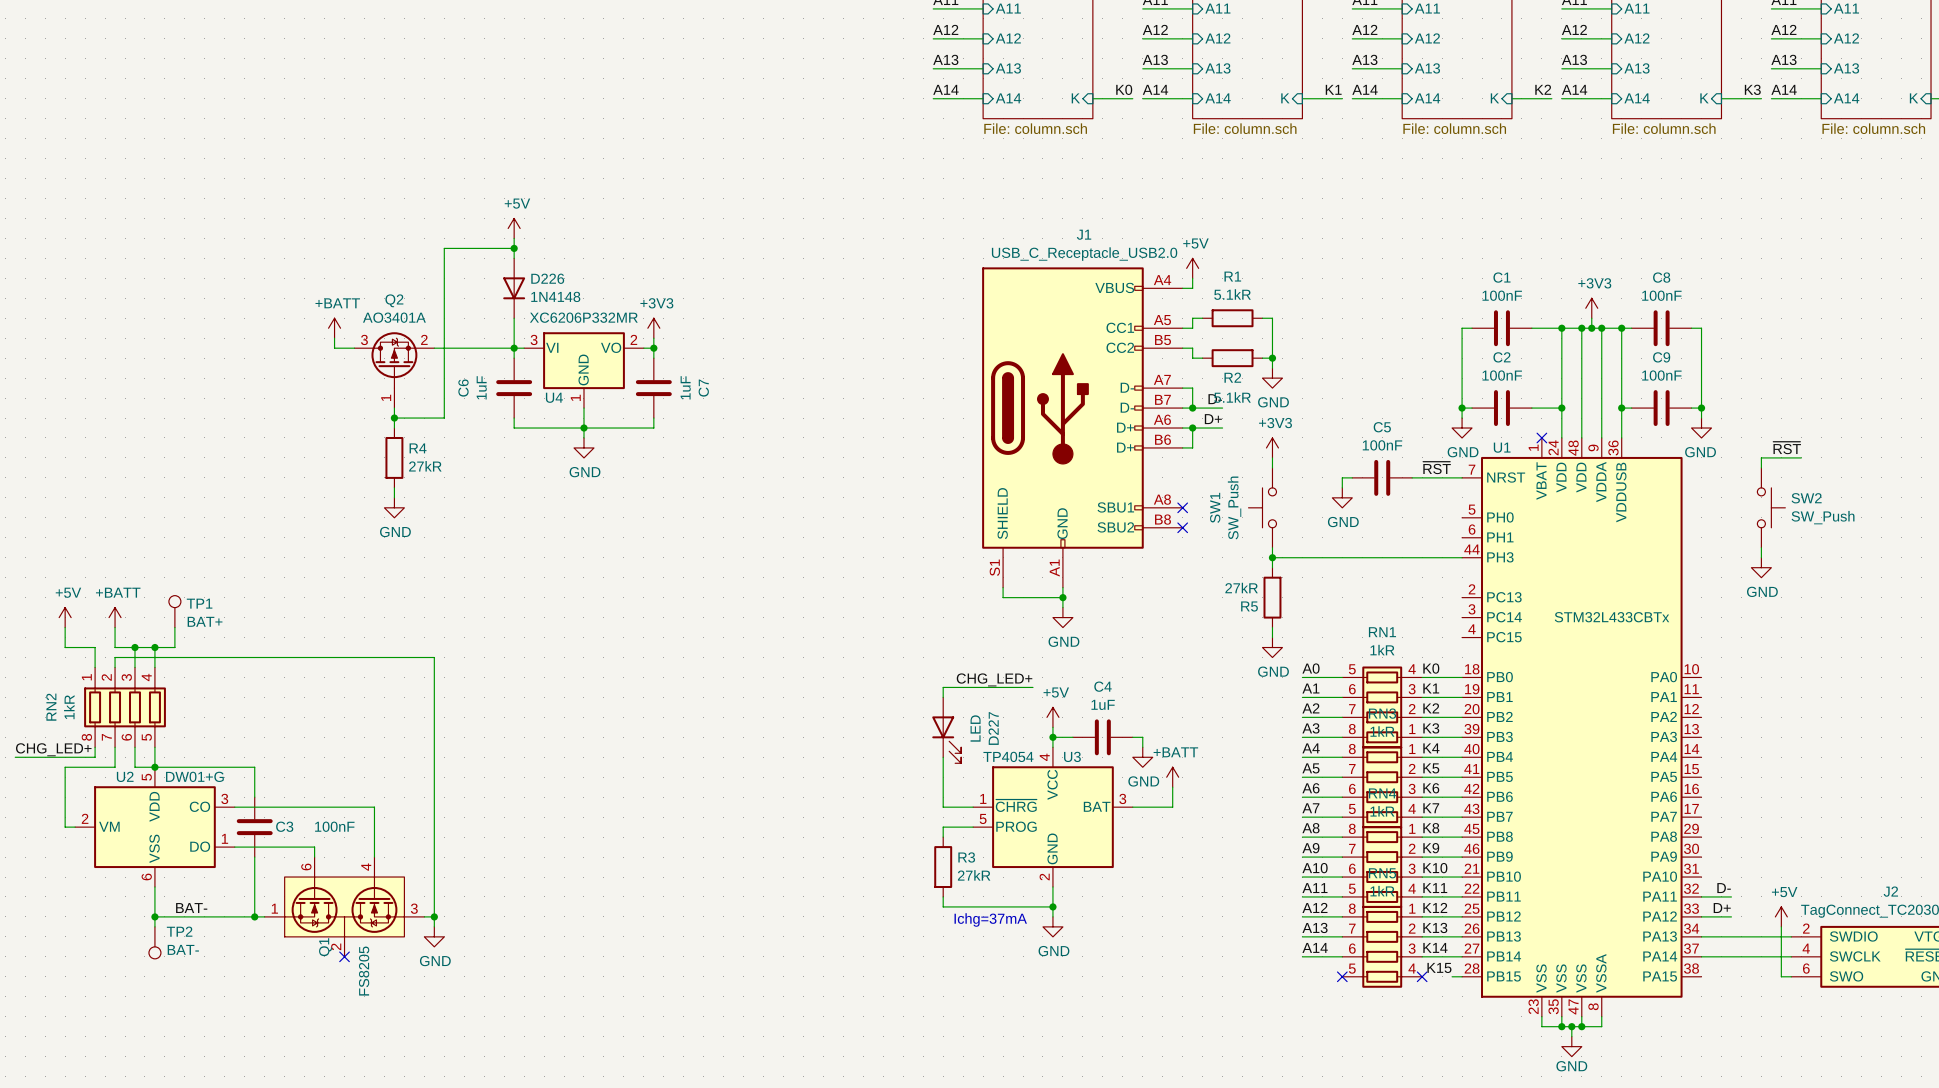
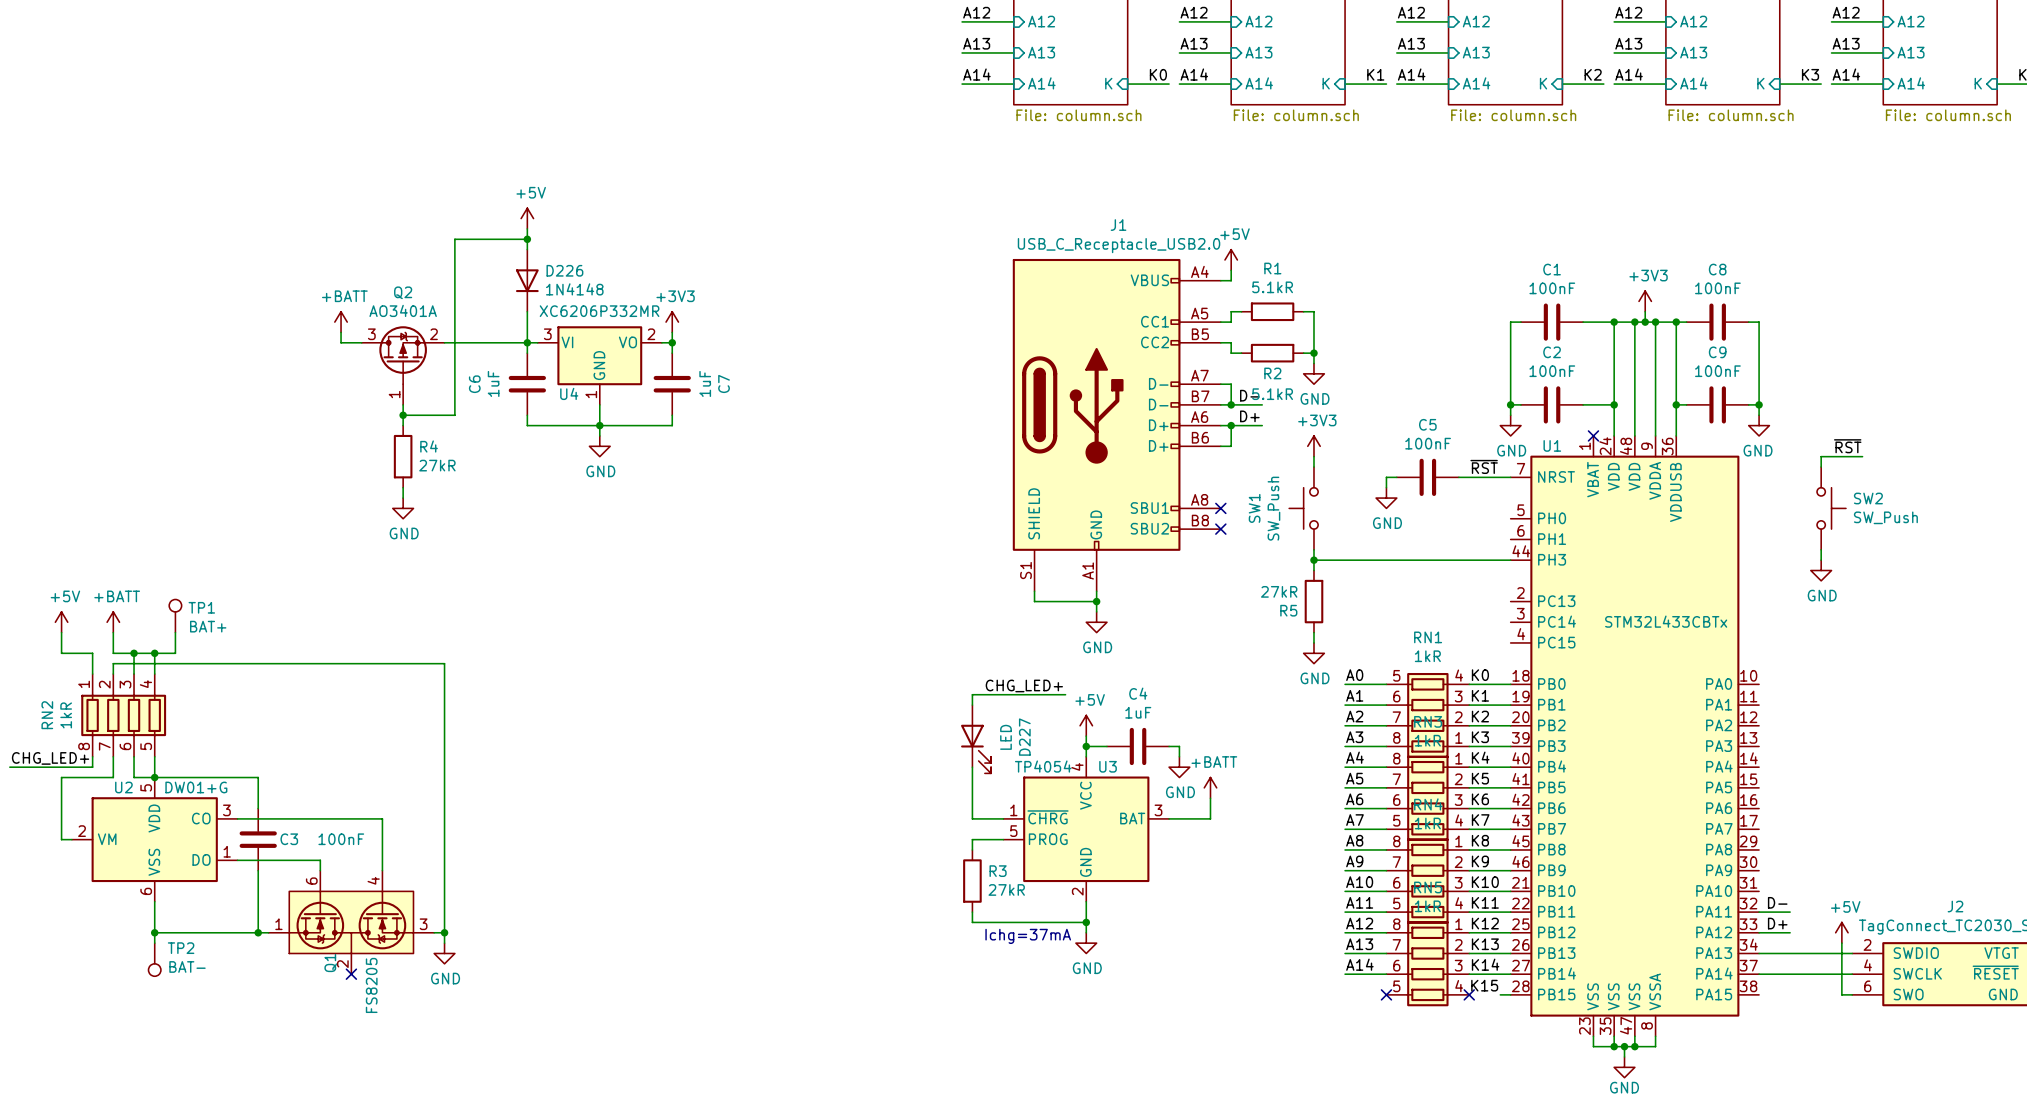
label: BAT- (191, 908) -> none

